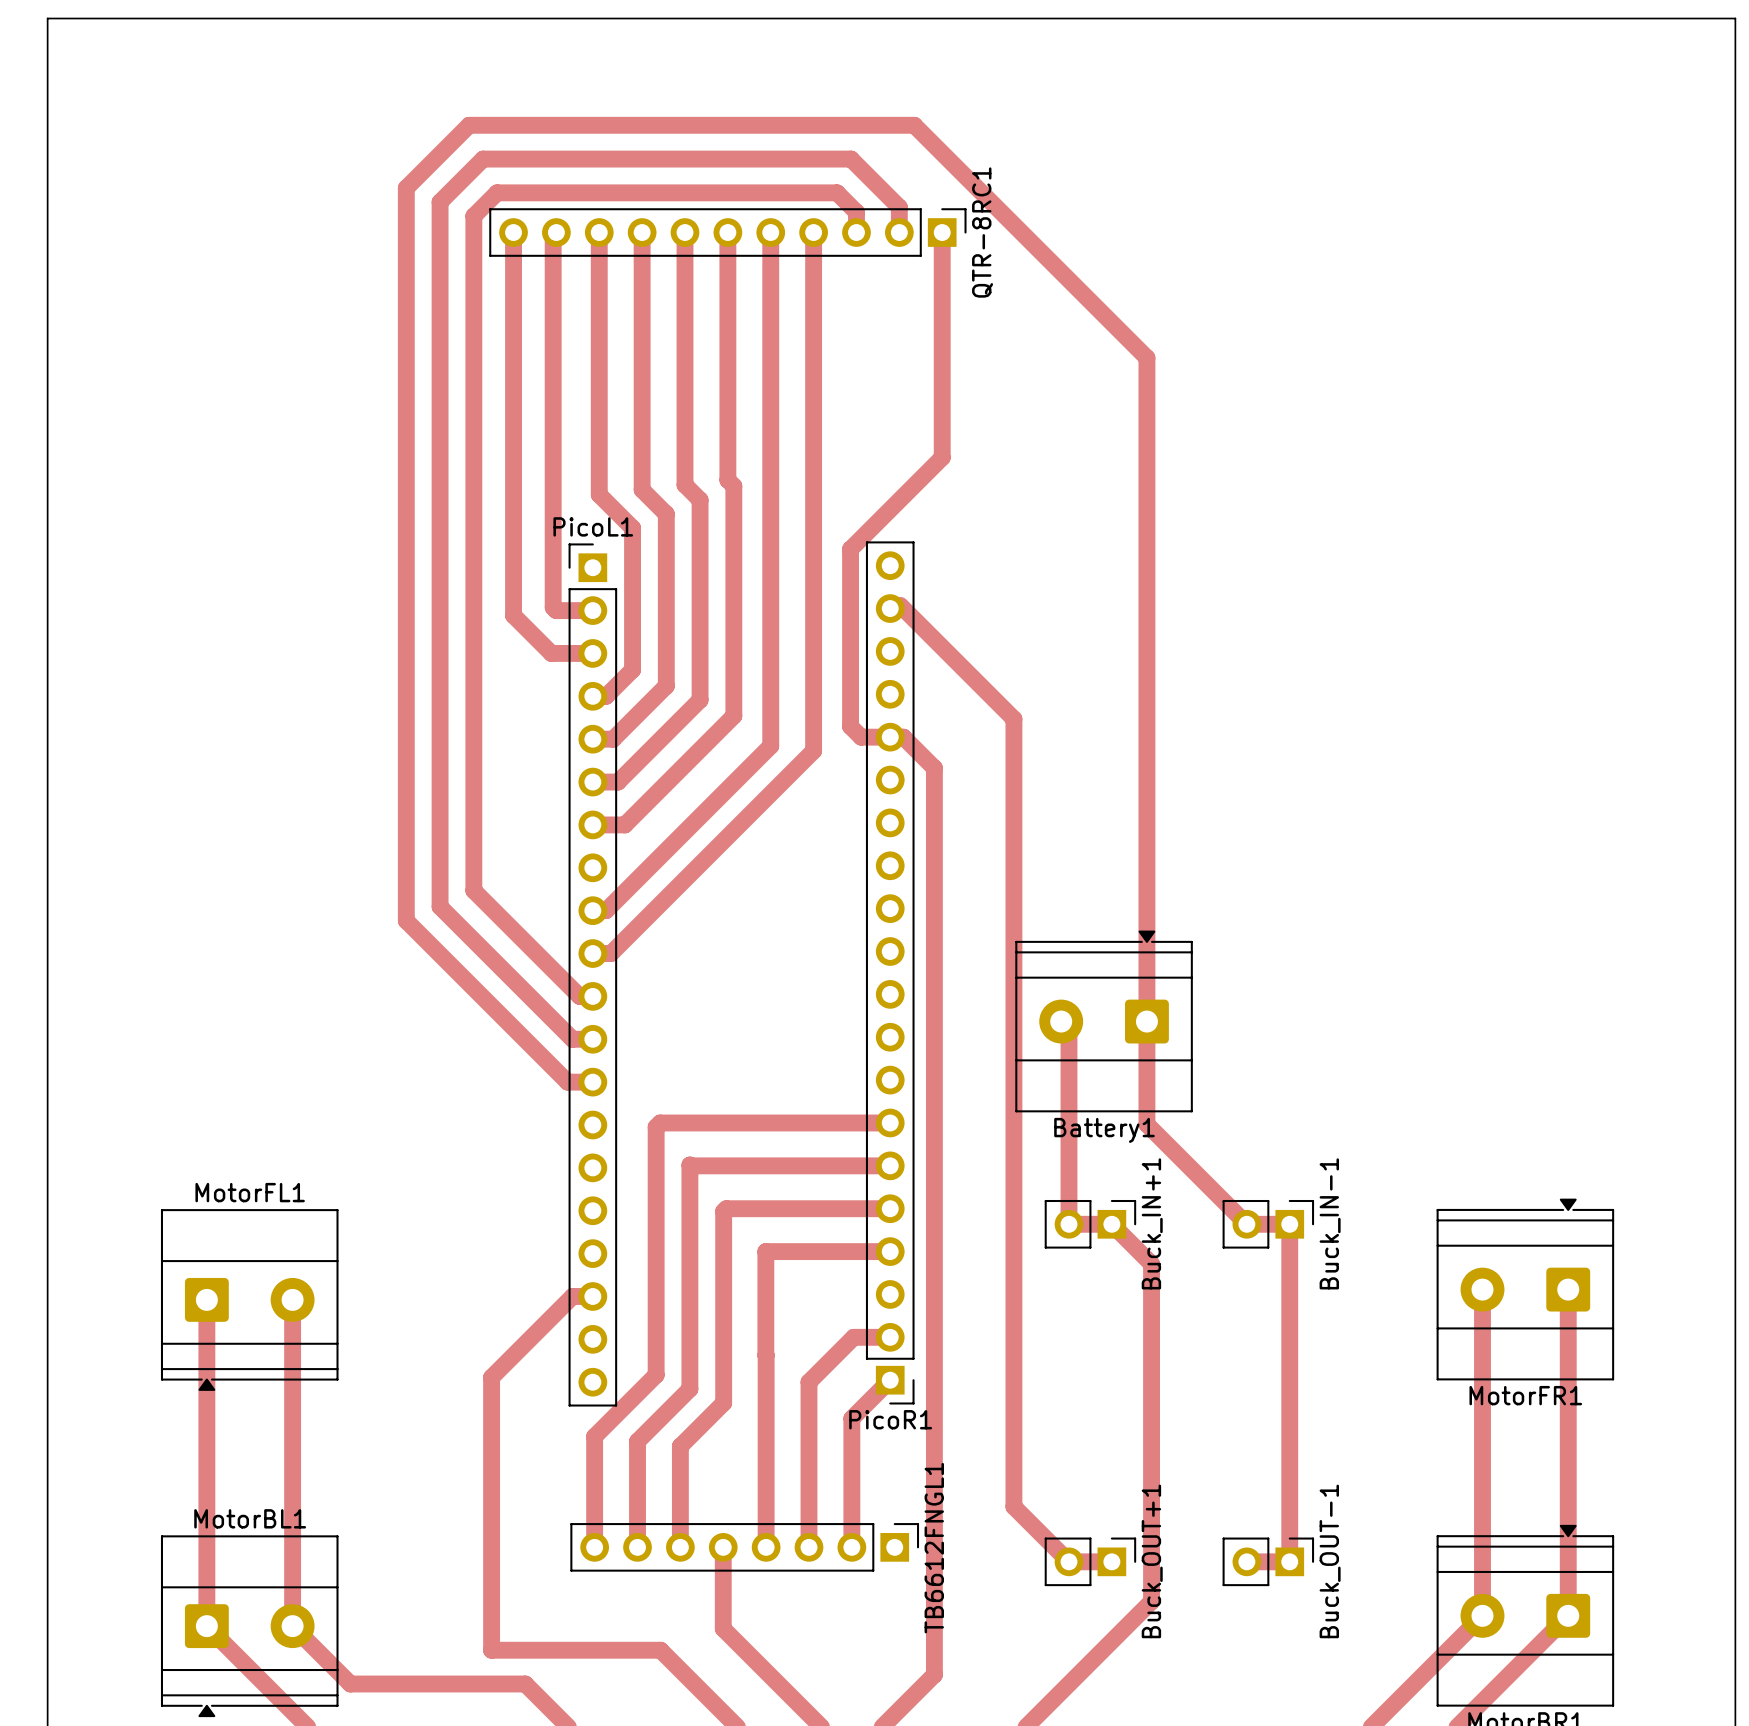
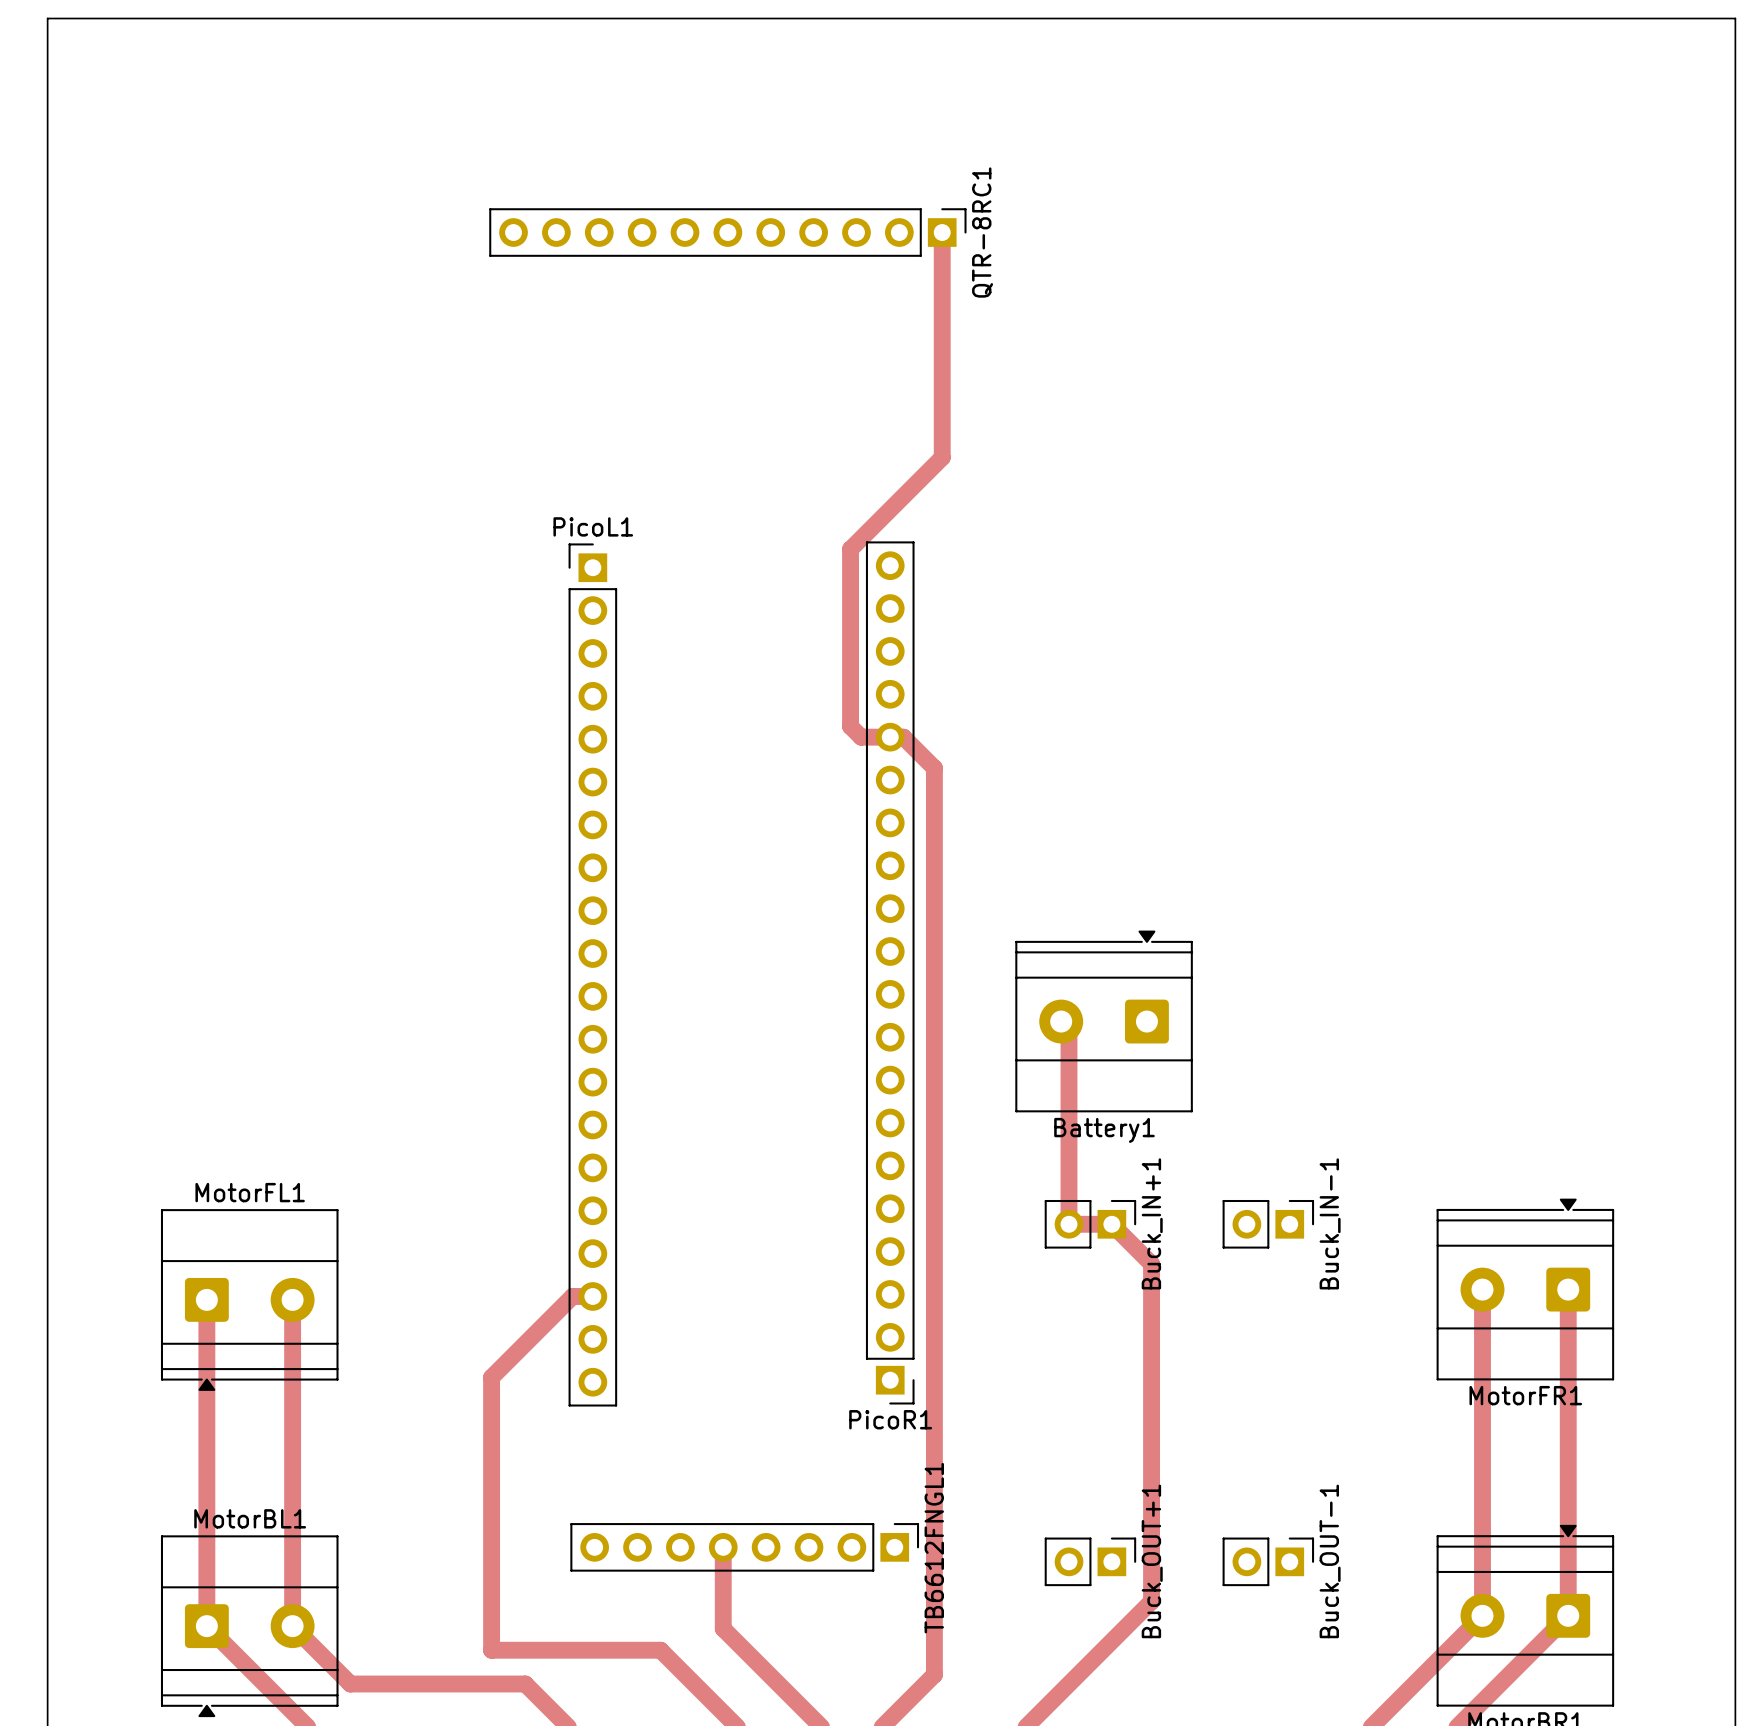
top track: (513, 232) (513, 615) (551, 653) (592, 653) -> none
top track: (556, 232) (553, 235) (553, 607) (556, 610) (592, 610) -> none
top track: (599, 232) (599, 494) (632, 528) (632, 669) (606, 696) (592, 696) -> none
top track: (642, 232) (642, 489) (666, 514) (666, 686) (613, 739) (592, 739) -> none
top track: (685, 232) (685, 484) (700, 500) (700, 700) (618, 782) (592, 782) -> none
top track: (727, 232) (727, 480) (733, 486) (733, 715) (624, 824) (592, 824) -> none
top track: (770, 232) (770, 746) (606, 910) (592, 910) -> none
top track: (813, 232) (813, 750) (610, 953) (592, 953) -> none
top track: (856, 232) (856, 212) (837, 192) (497, 192) (473, 216) (473, 890) (579, 996) (592, 996) -> none
top track: (899, 232) (899, 207) (851, 159) (483, 159) (440, 202) (440, 906) (572, 1039) (592, 1039) -> none
top track: (900, 605) (1013, 719) (1013, 1506) (1069, 1561) (1111, 1561) -> none
top track: (592, 1082) (567, 1082) (406, 920) (406, 188) (469, 125) (914, 125) (1146, 357) (1146, 1124) (1246, 1224) (1289, 1224) (1289, 1561) (1246, 1561) -> none
top track: (890, 1122) (660, 1122) (656, 1127) (656, 1375) (594, 1436) (594, 1547) -> none
top track: (890, 1165) (689, 1165) (689, 1389) (637, 1441) (637, 1547) -> none
top track: (890, 1208) (726, 1208) (723, 1211) (723, 1403) (680, 1446) (680, 1547) -> none
top track: (890, 1251) (765, 1251) (766, 1547) -> none
top track: (890, 1337) (853, 1337) (808, 1382) (808, 1547) -> none
top track: (890, 1380) (851, 1418) (851, 1547) -> none

